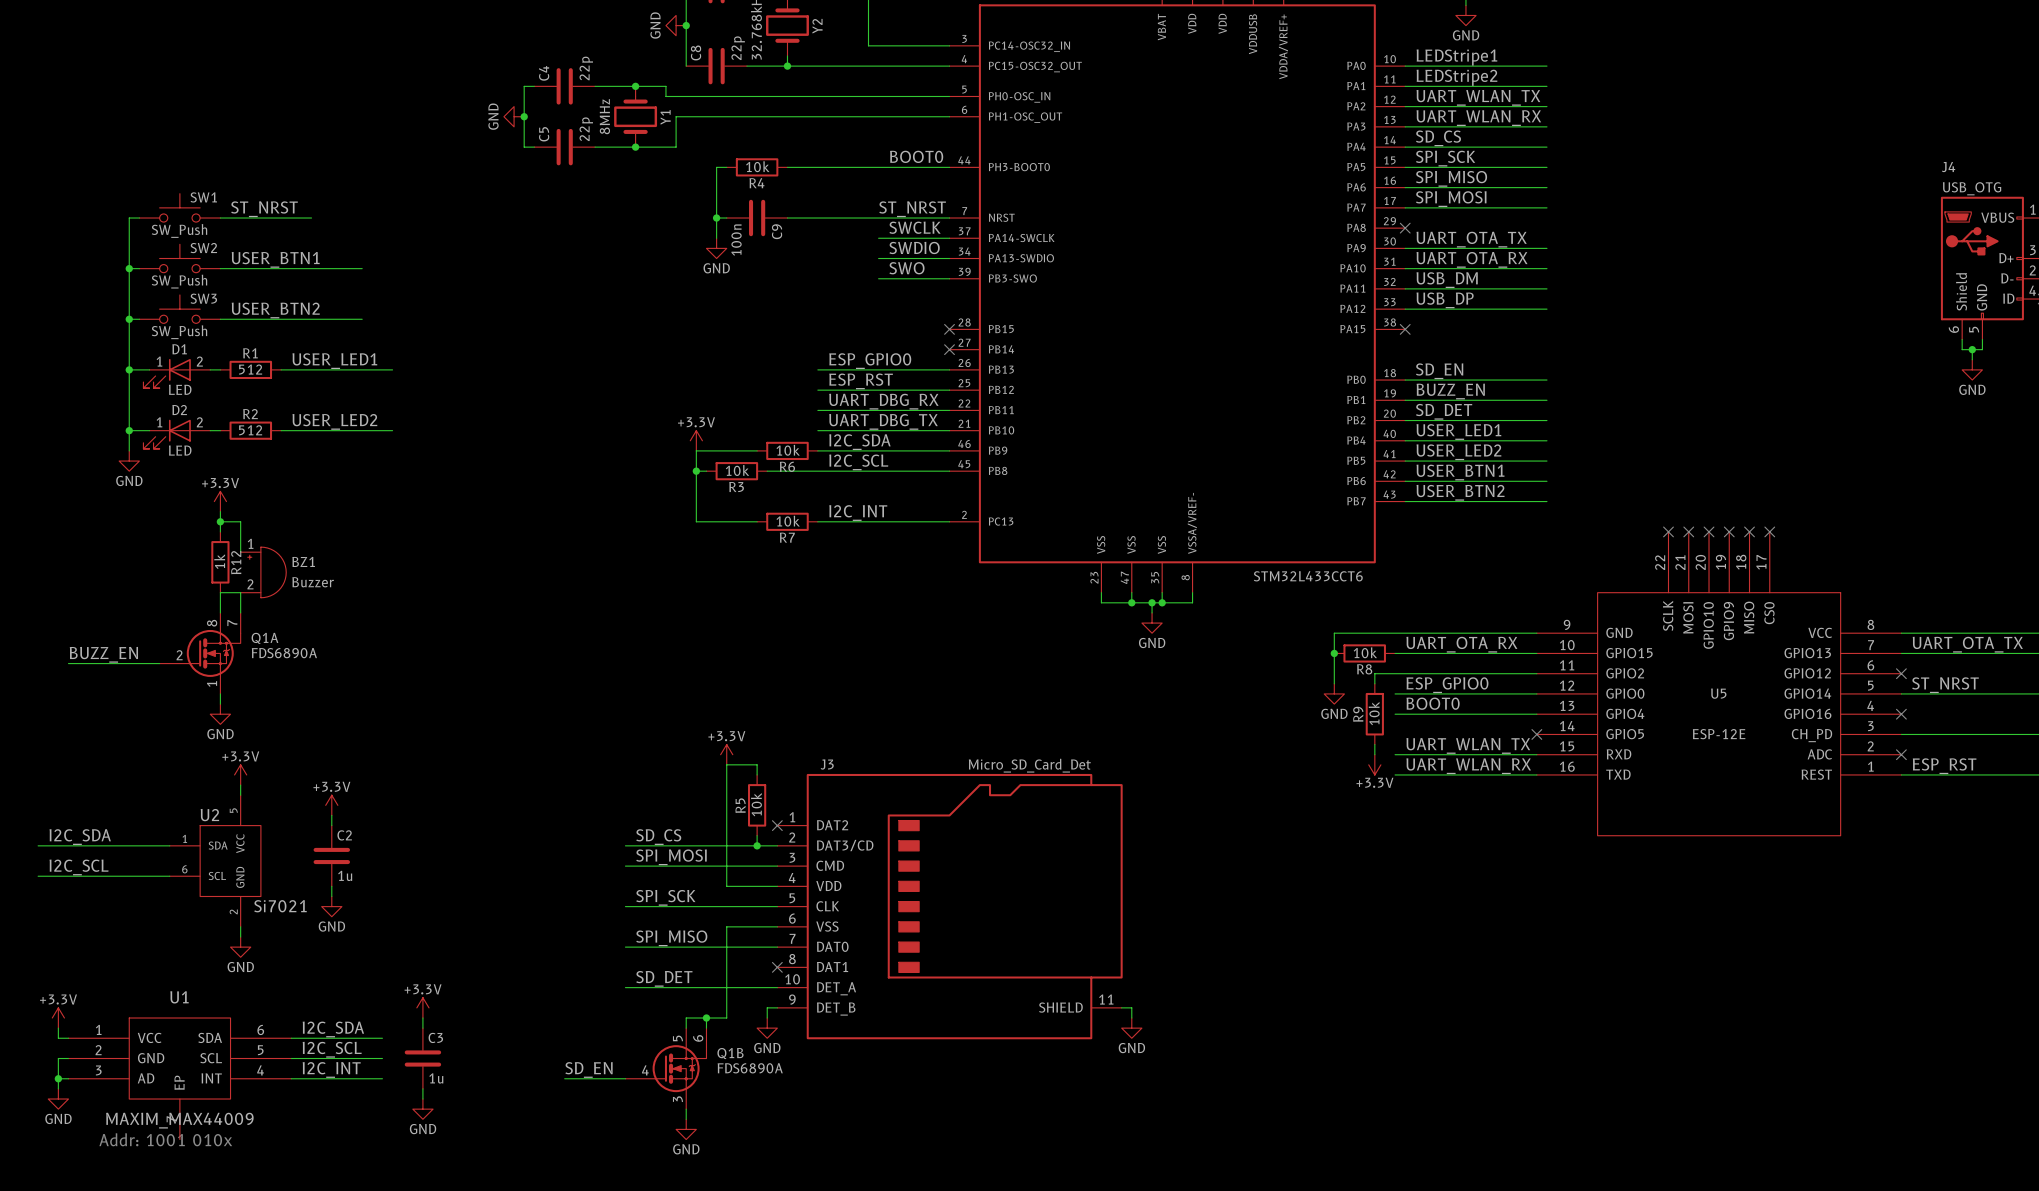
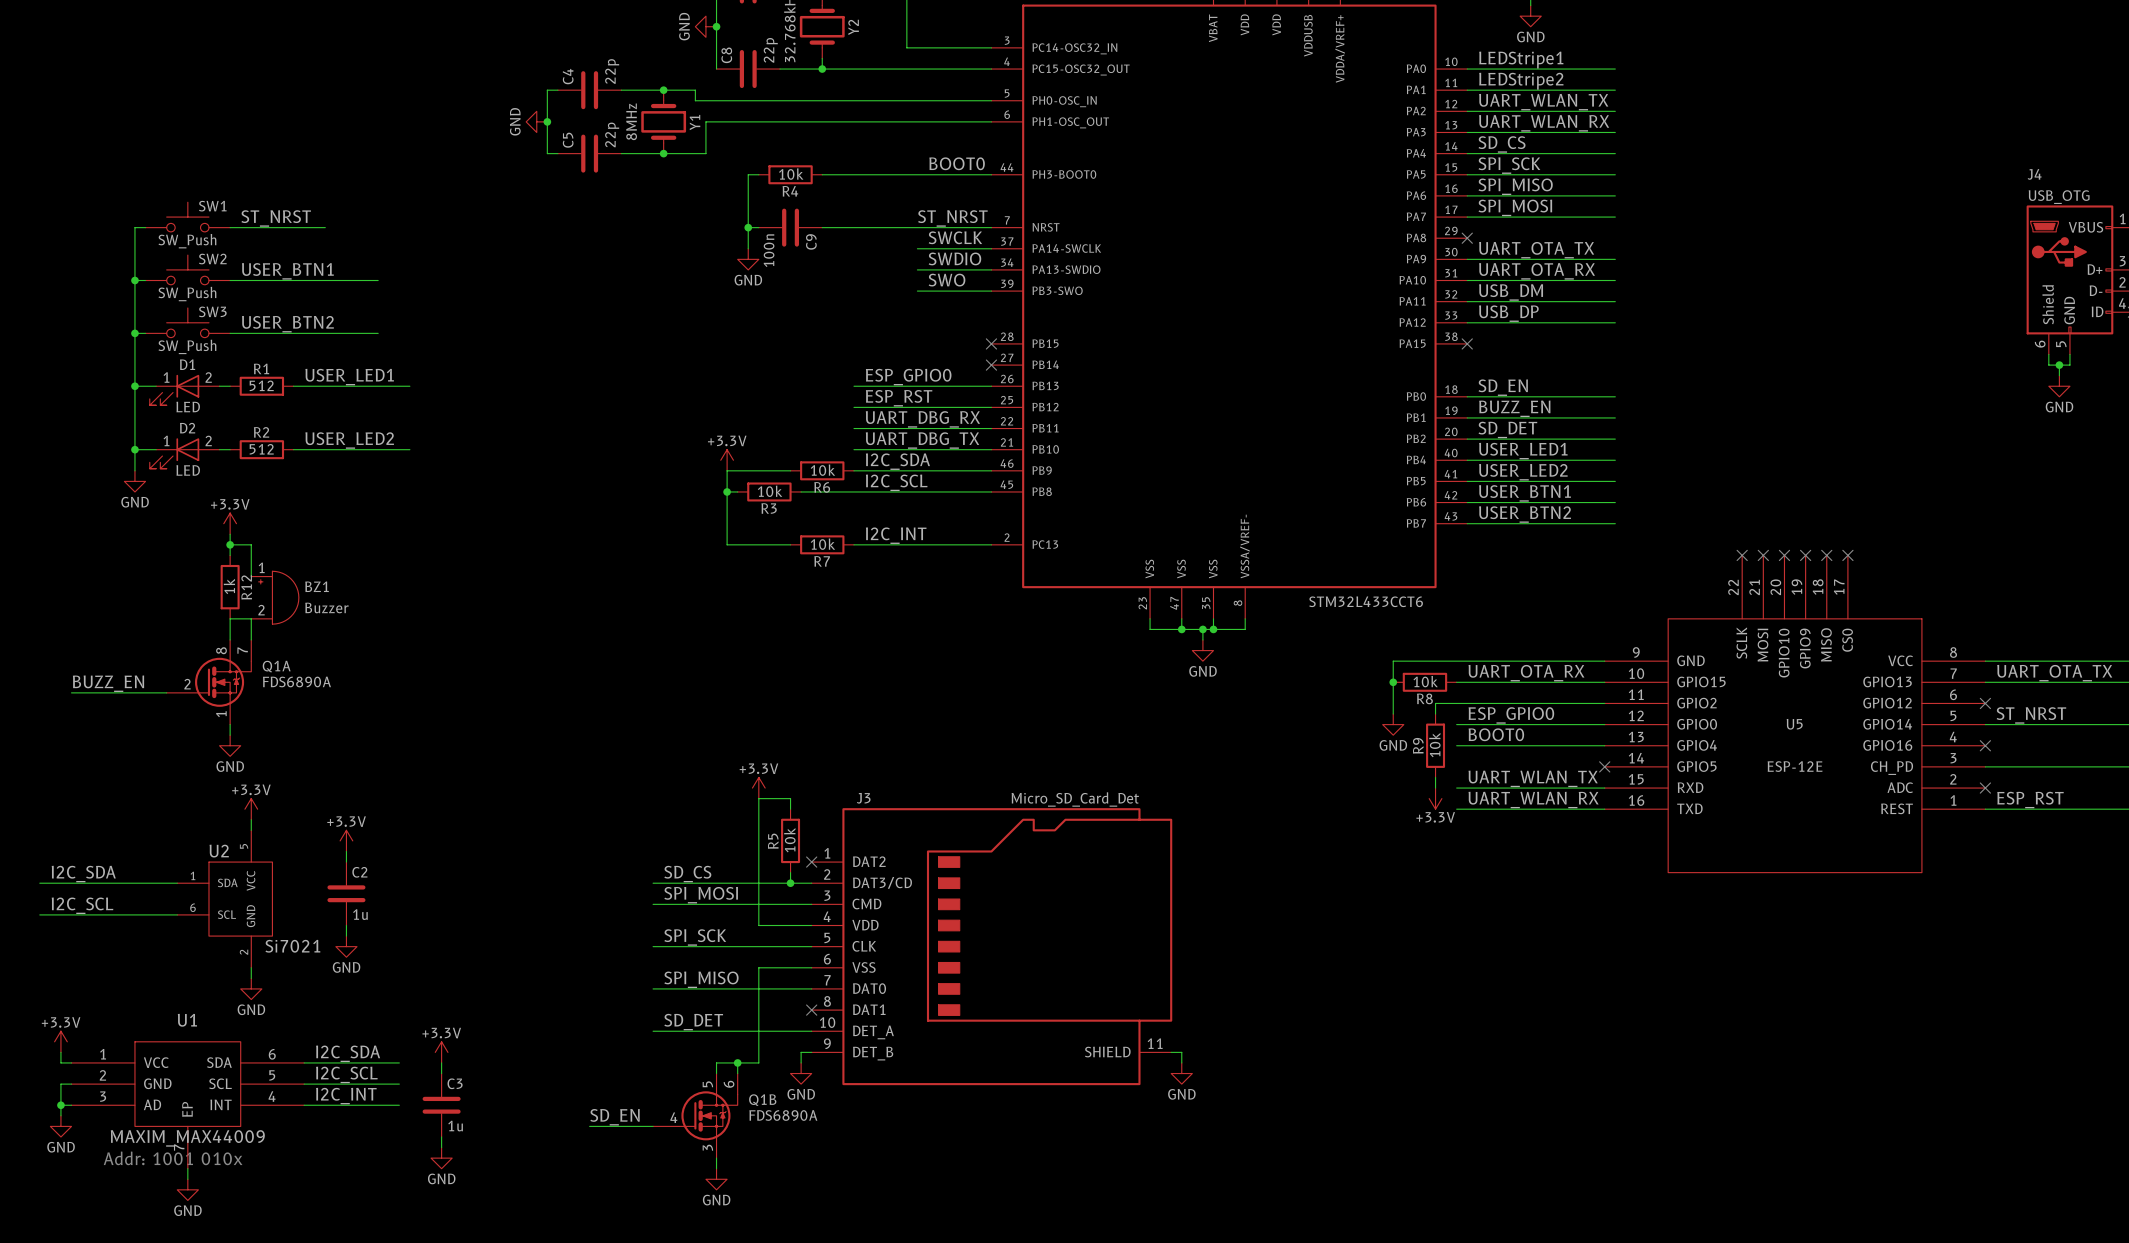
label: none -> I2C_SDA (348, 1053)
power symbol position: +3.3V (58, 1018) -> +3.3V (60, 1041)
wire: (58, 1028) (58, 1038) -> (60, 1105) (60, 1084)
label: I2C_SDA (333, 1029) -> I2C_SCL (346, 1074)
label: I2C_SCL (332, 1049) -> I2C_INT (346, 1096)
label: I2C_INT (331, 1069) -> none
junction position: (58, 1078) -> (60, 1105)
U1 position: (179, 1078) -> (187, 1105)
wire: (291, 1078) (382, 1078) -> (304, 1062) (399, 1062)
power symbol position: GND (58, 1099) -> GND (60, 1126)
U1 value position: MAXIM_MAX44009 (179, 1120) -> MAXIM_MAX44009 (187, 1138)
text position: Addr: 1001 010x (165, 1139) -> Addr: 1001 010x (173, 1158)
power symbol: none -> GND (187, 1189)

